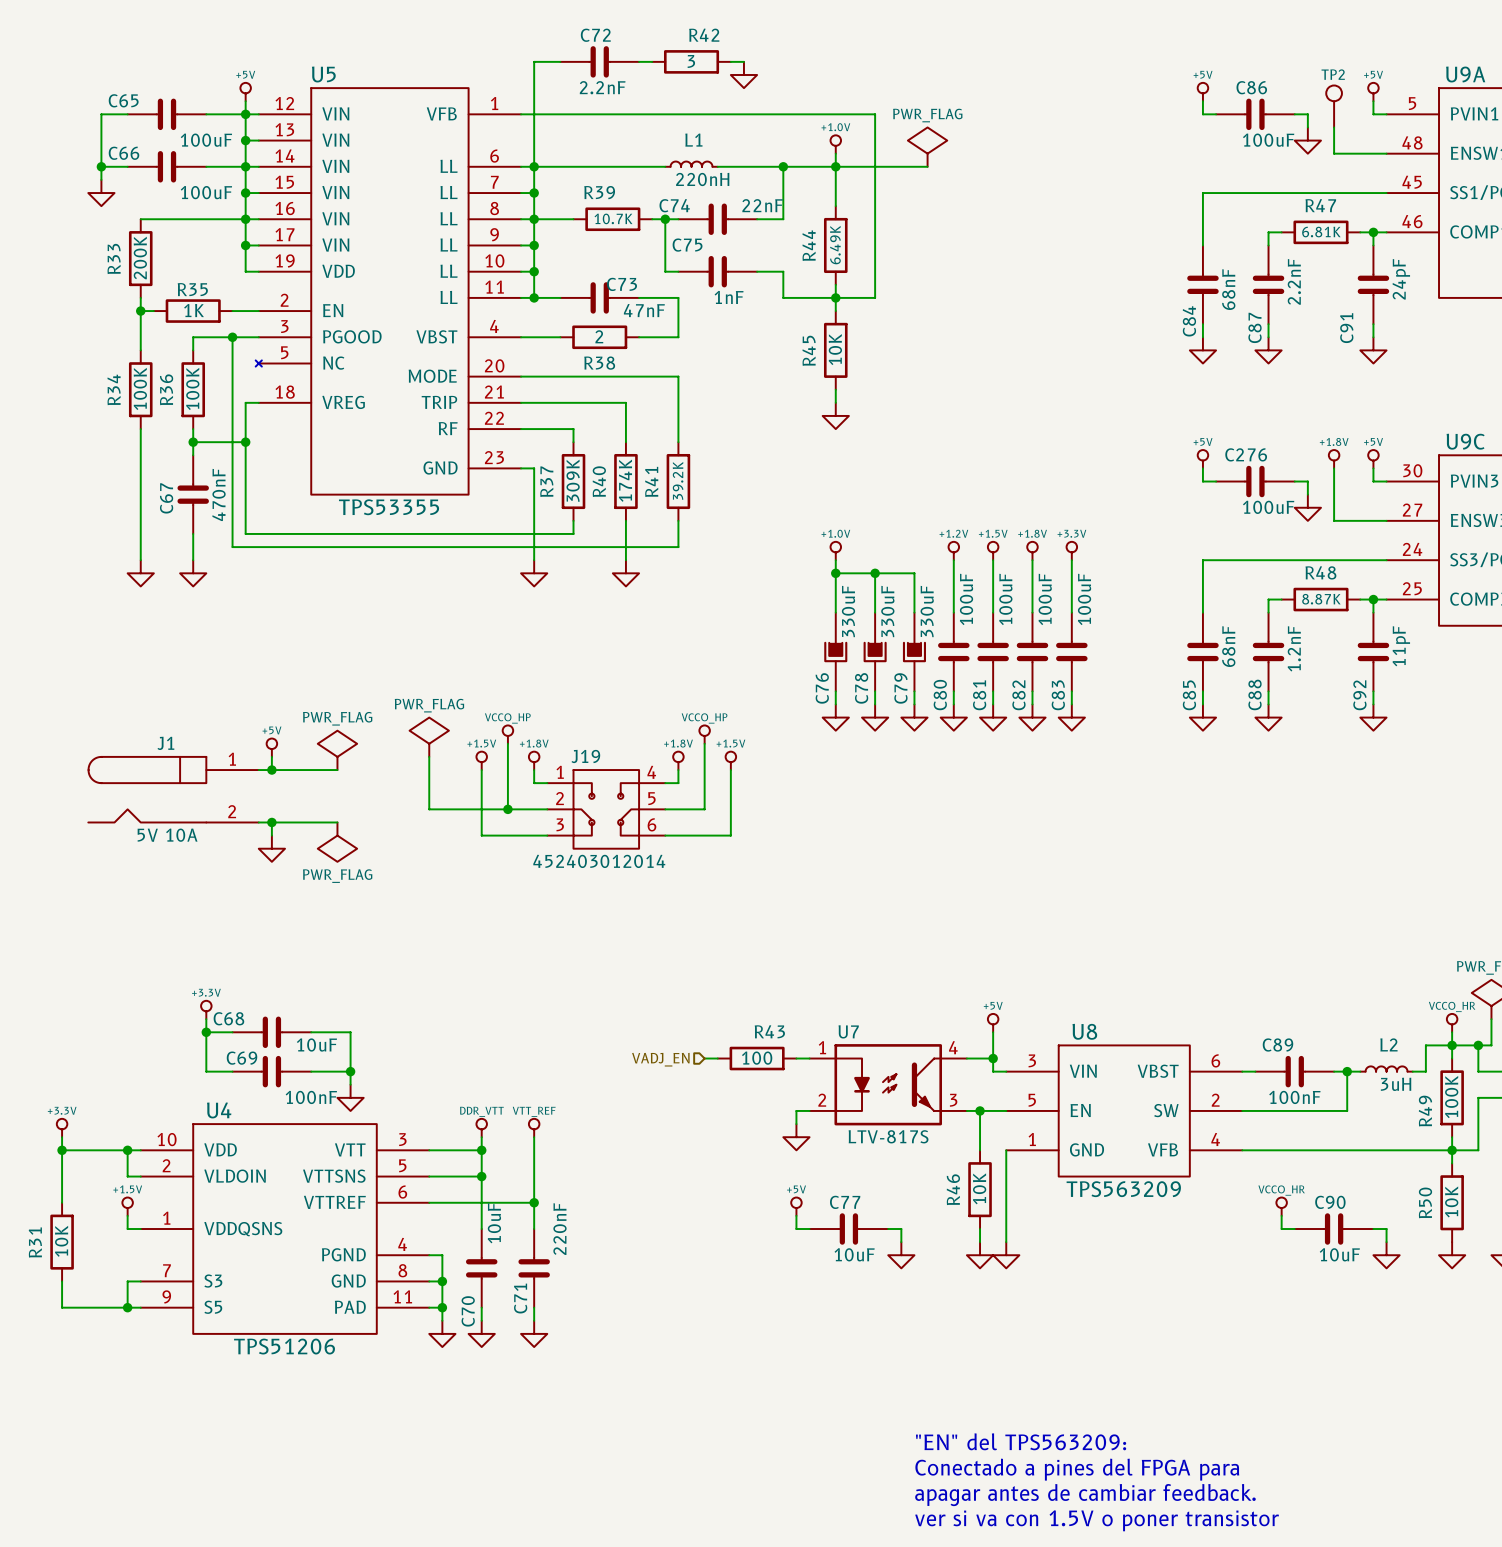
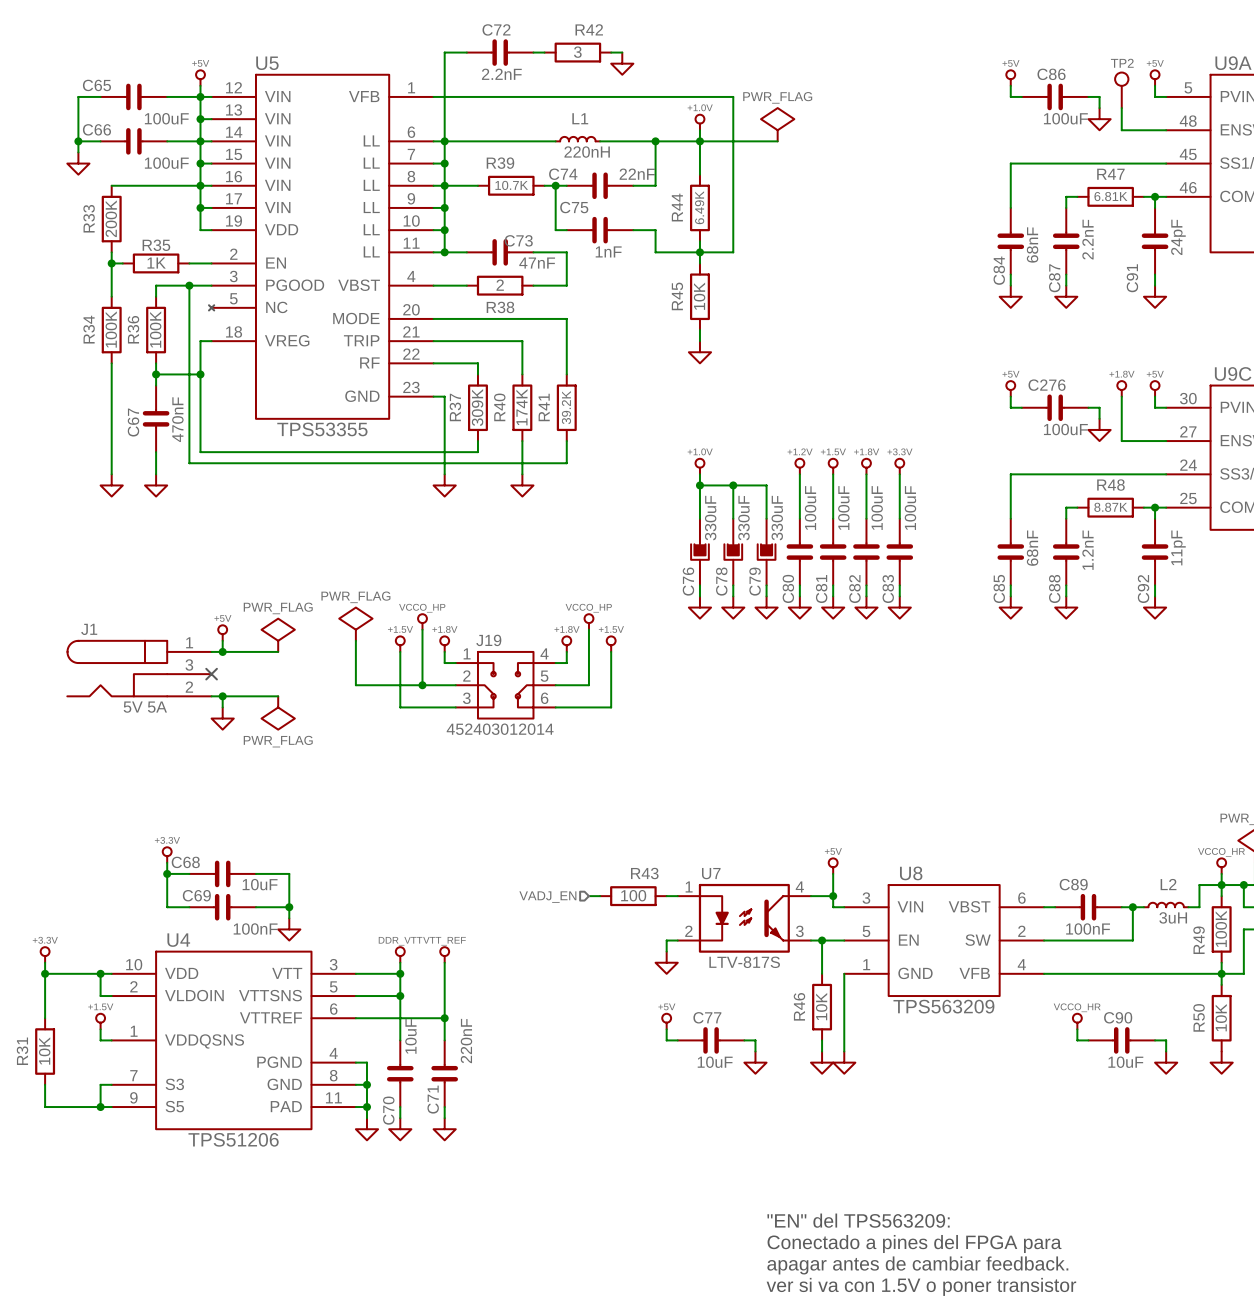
J1 name position: J1 (165, 743) -> J1 (89, 629)
J1 symbol: [88, 756, 259, 823] -> [67, 640, 212, 697]
no-connect mark: none -> (211, 674)
J1 value: 5V 10A (167, 835) -> 5V 5A (145, 707)

